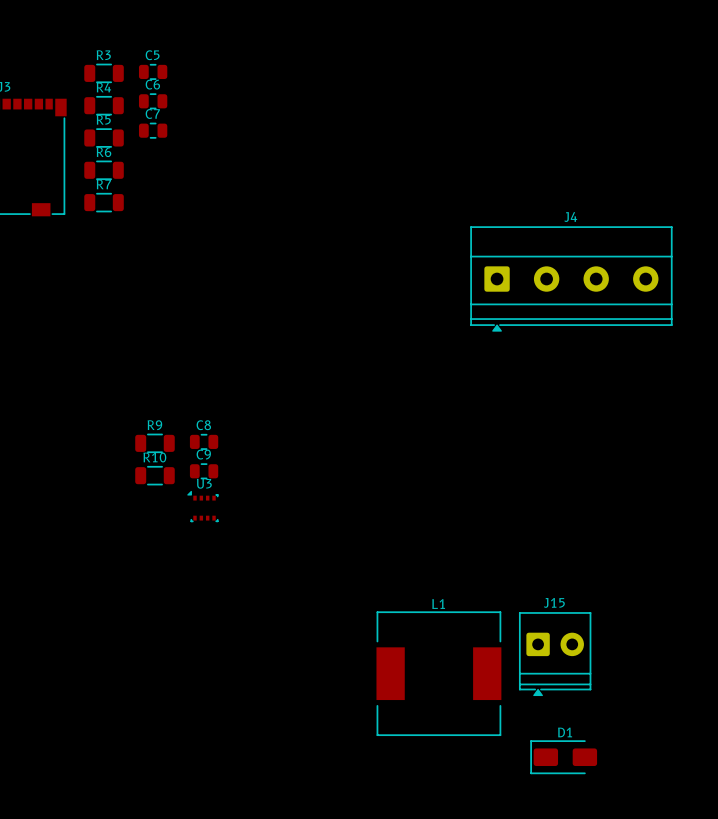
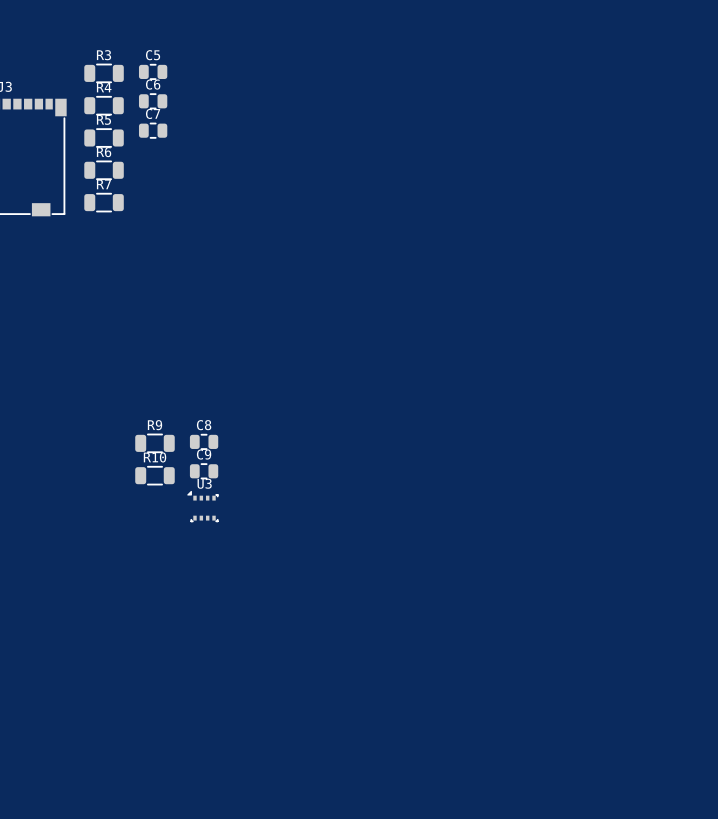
J4: (571, 279) -> none
J15: (555, 654) -> none
L1: (438, 673) -> none
D1: (563, 757) -> none

